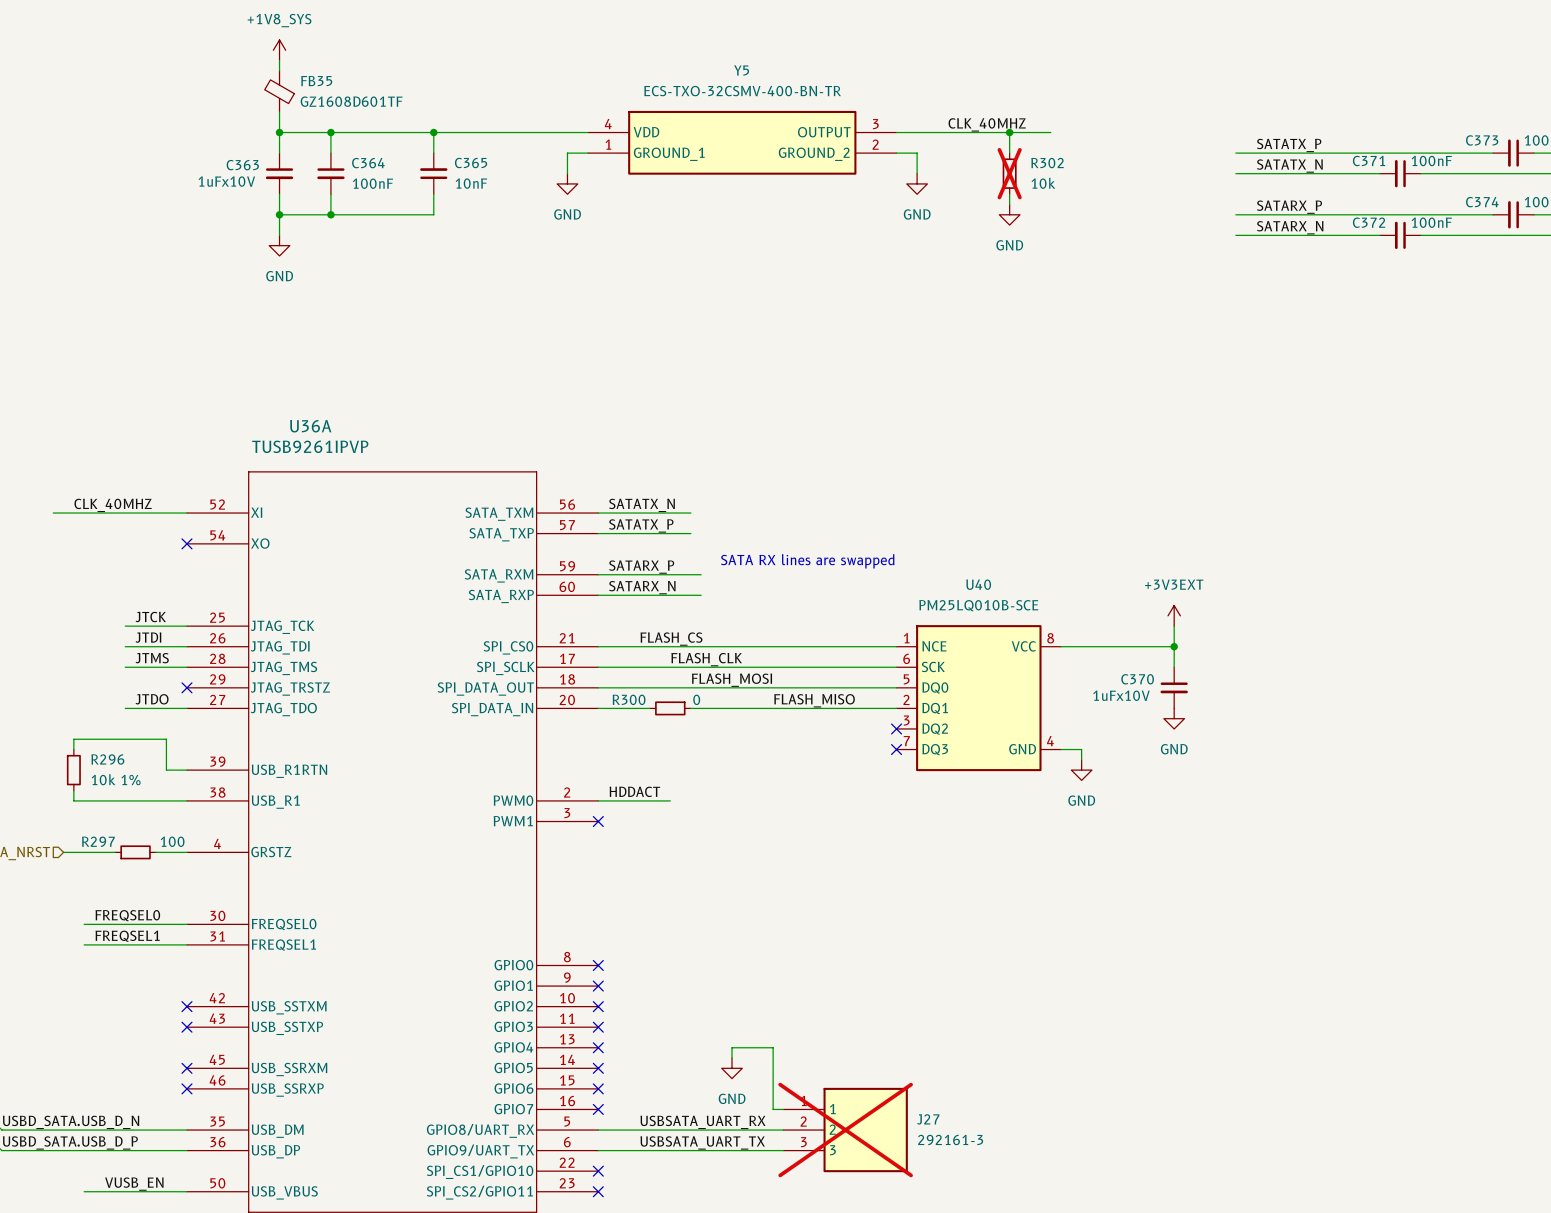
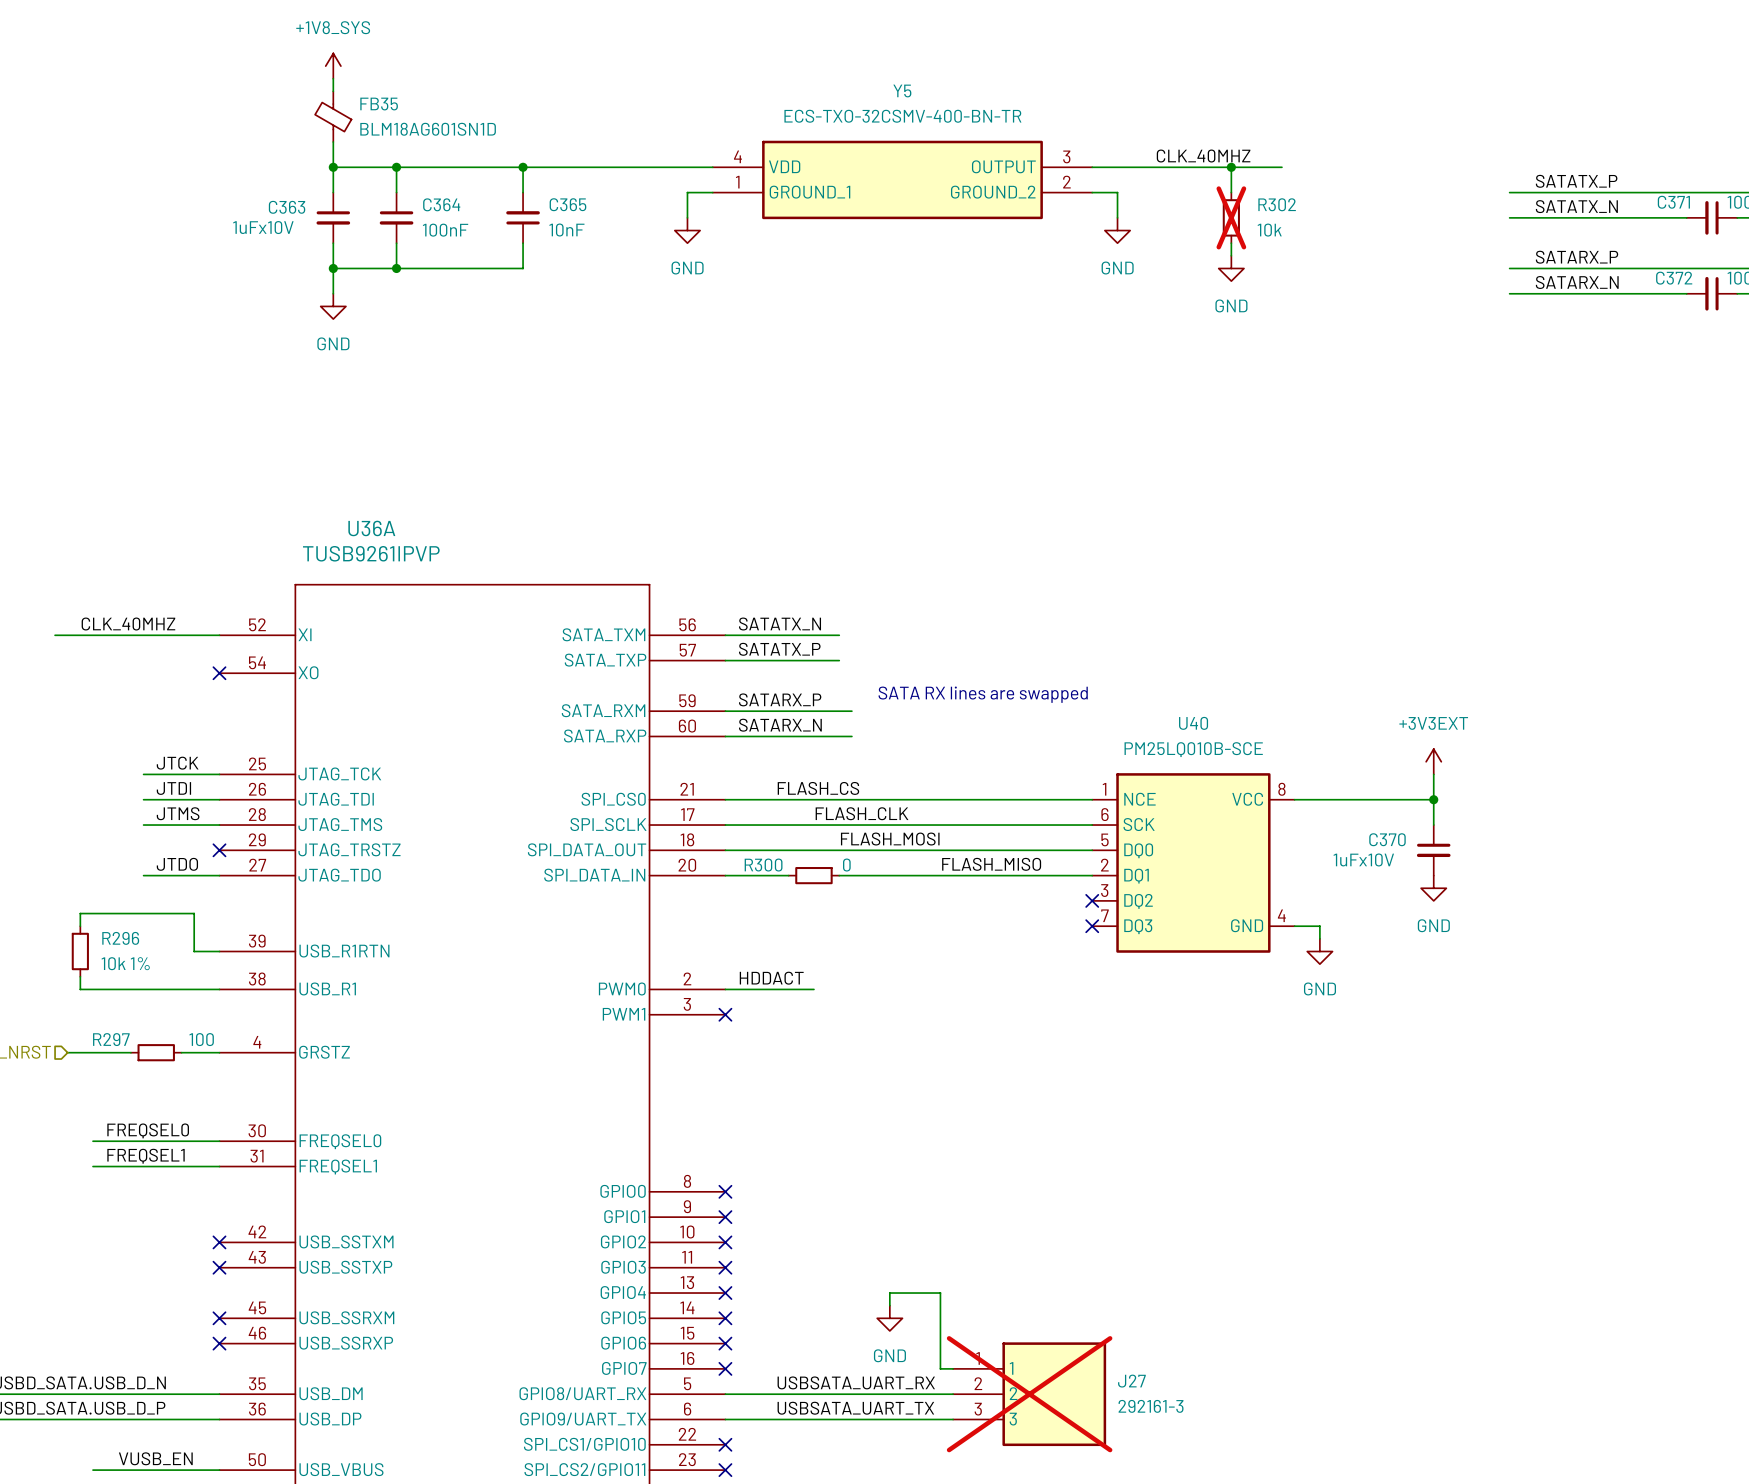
FB35 value: GZ1608D601TF (351, 101) -> BLM18AG601SN1D (428, 129)

